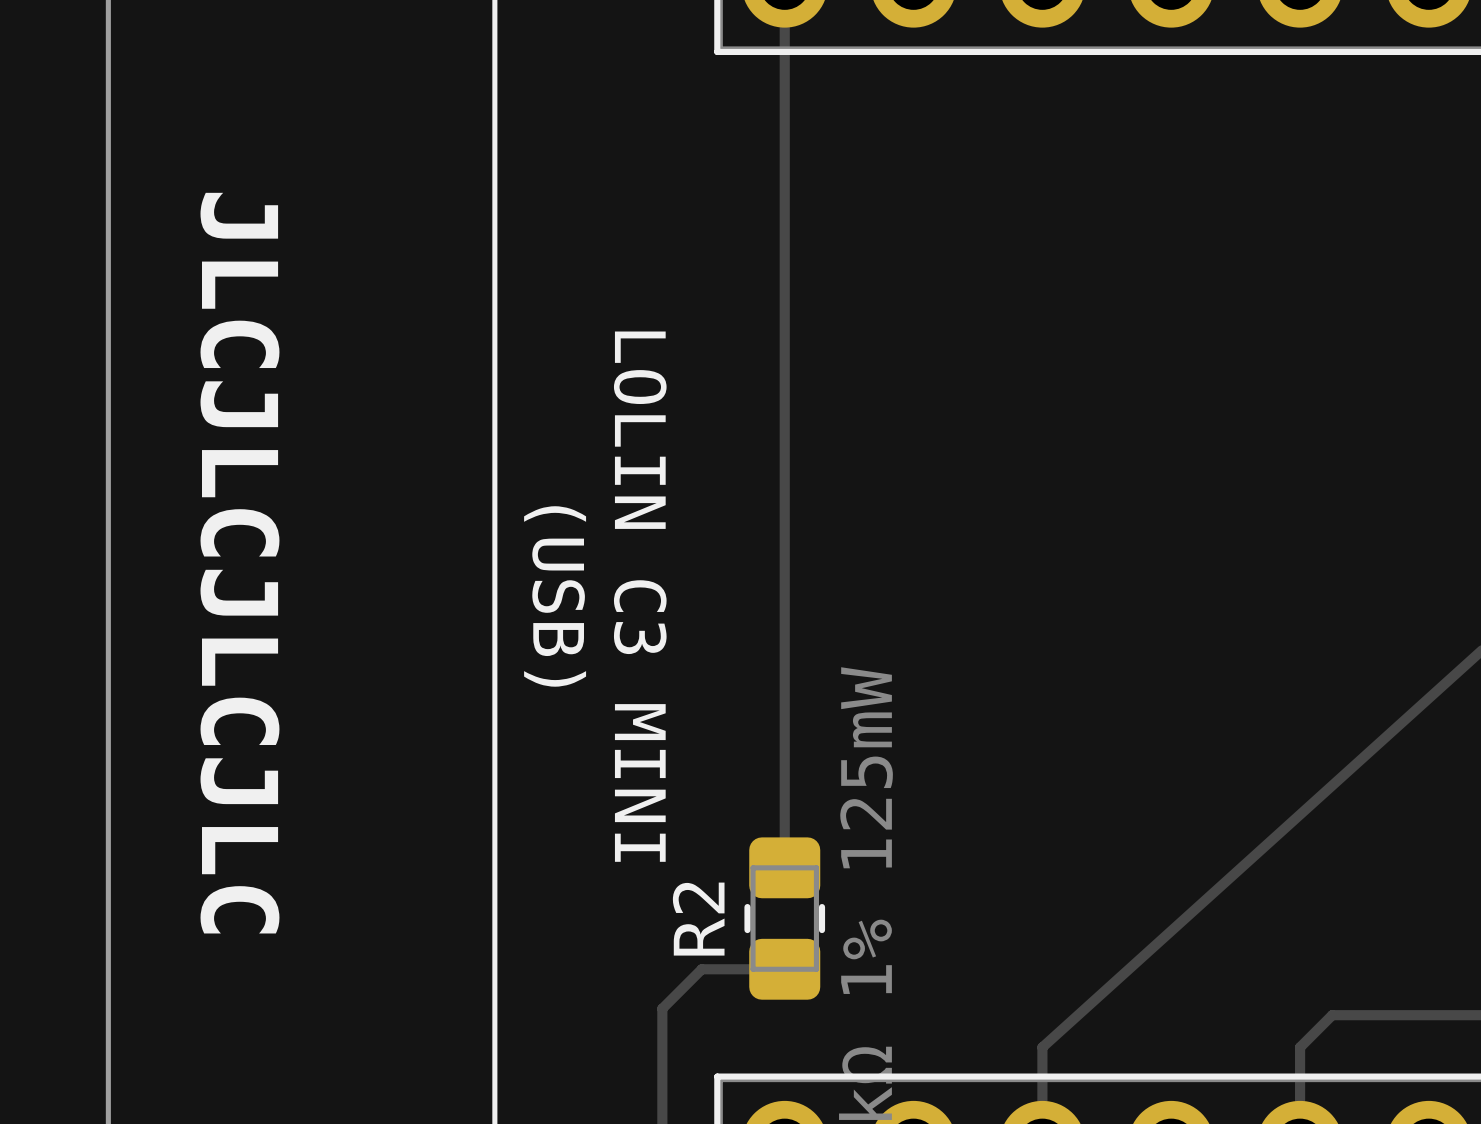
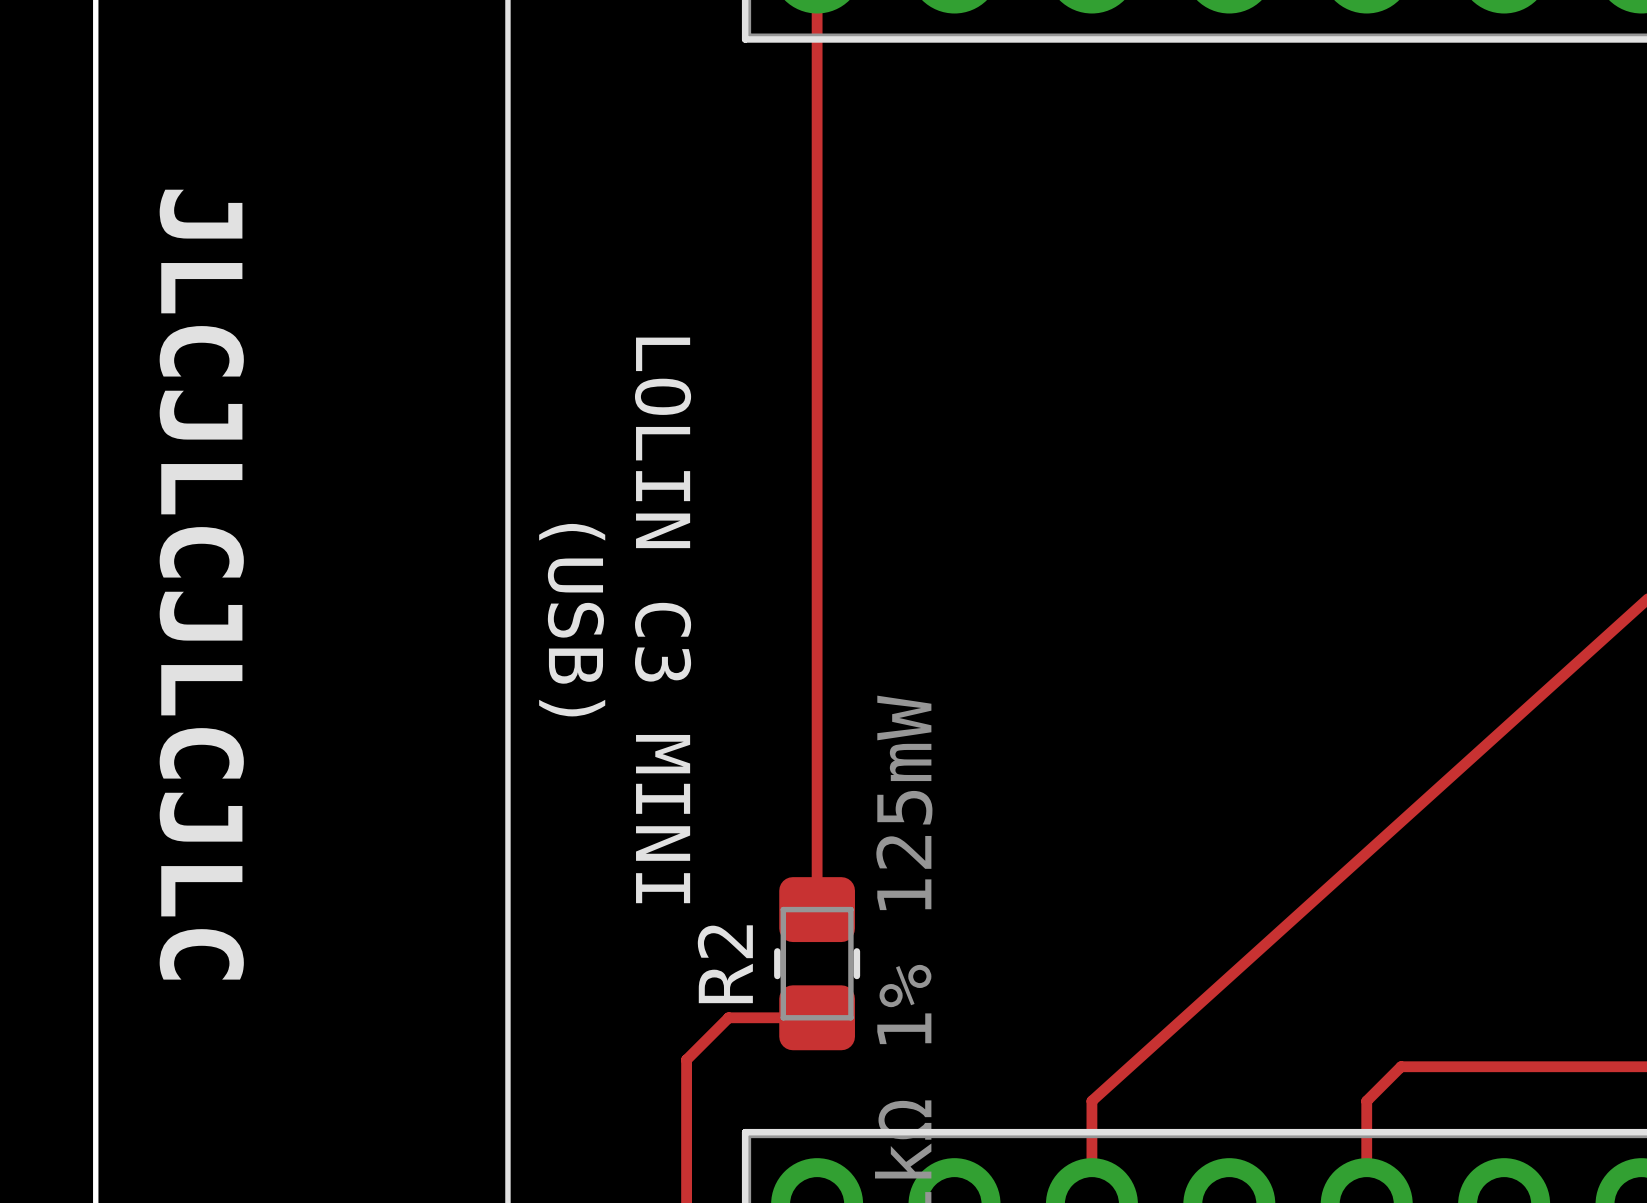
text position: JLCJLCJLCJLC (239, 563) -> JLCJLCJLCJLC (201, 584)

